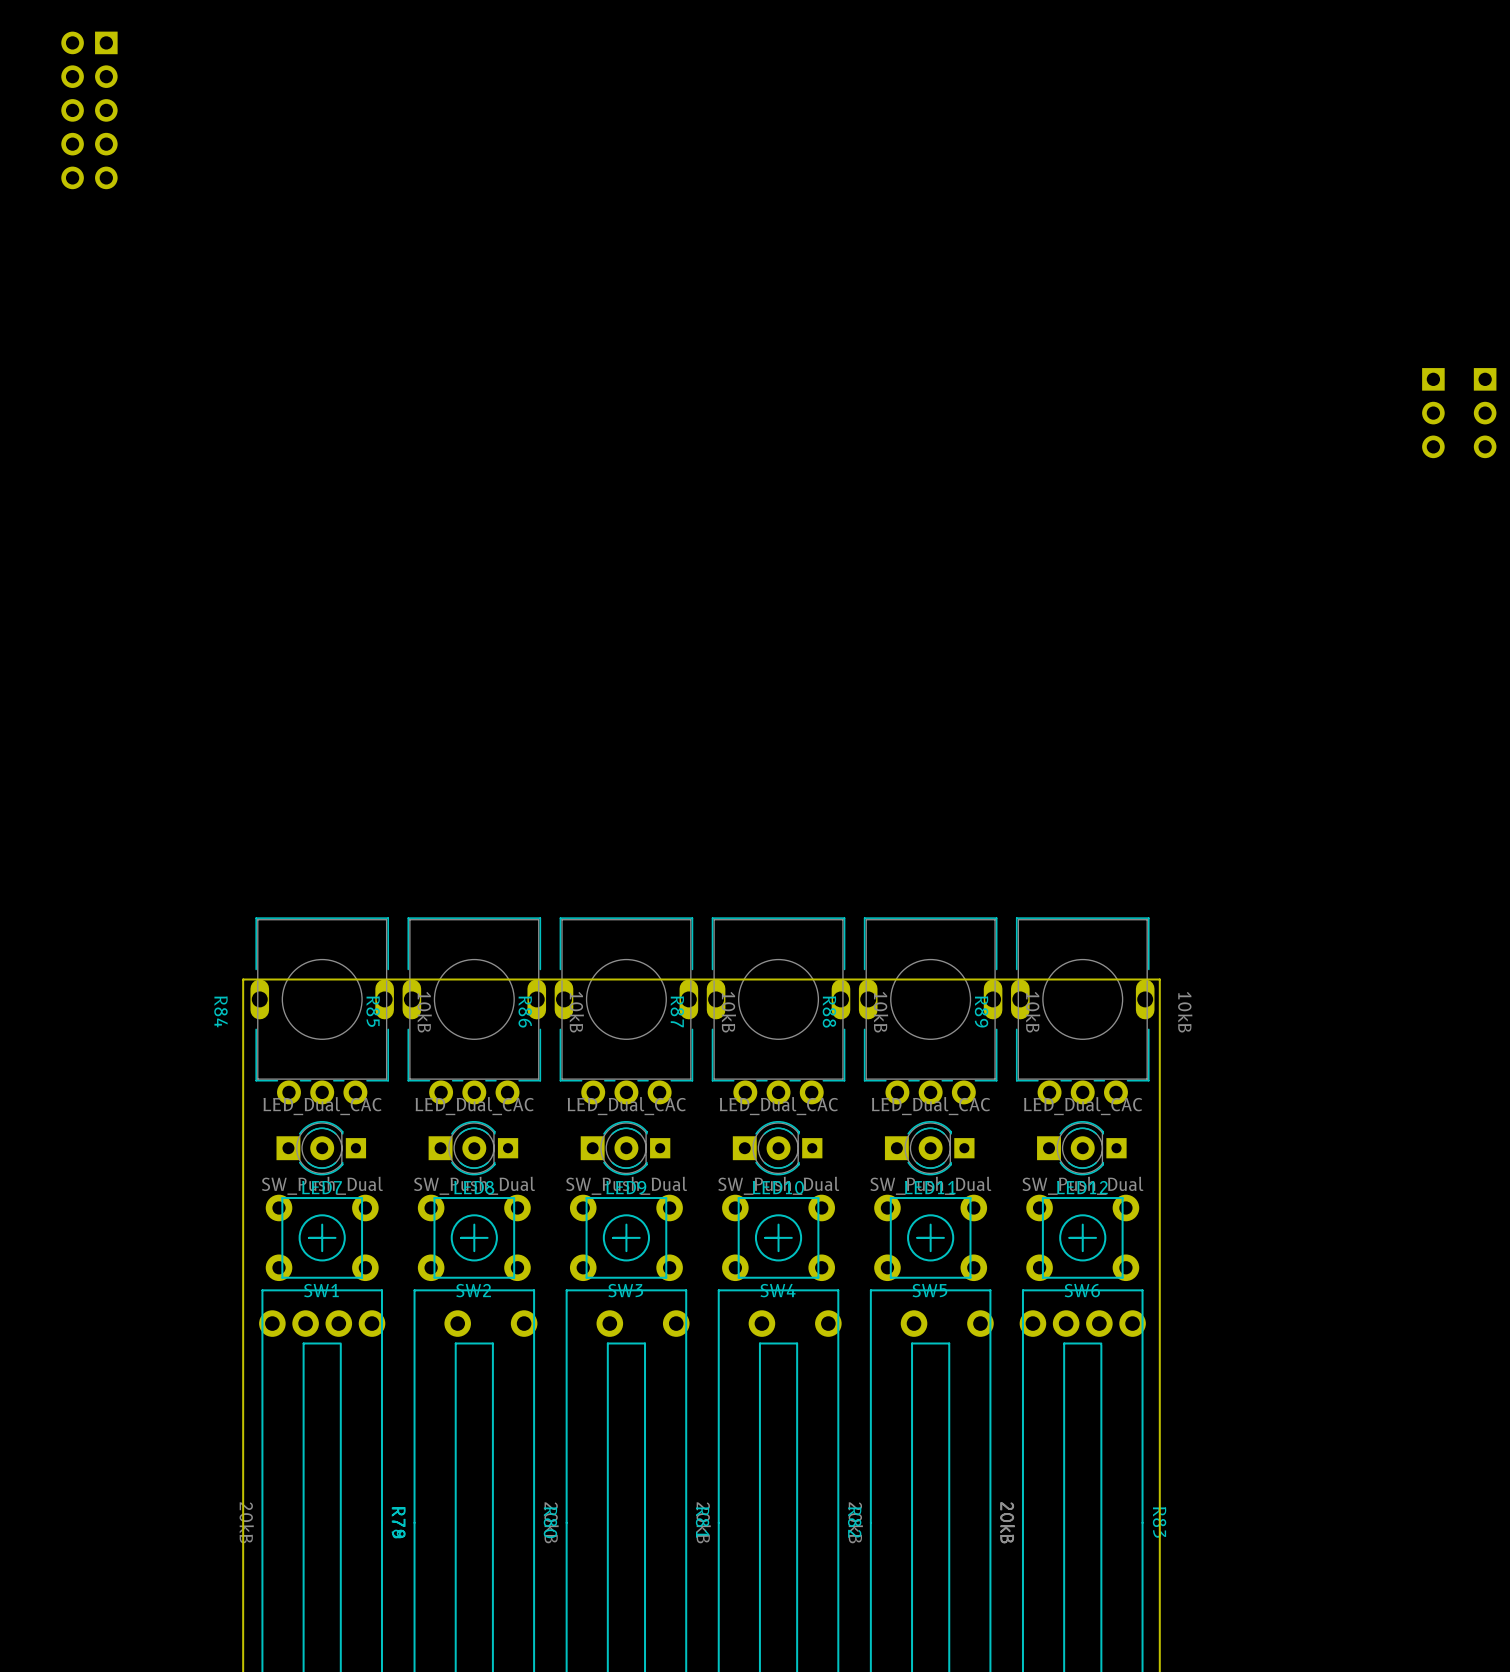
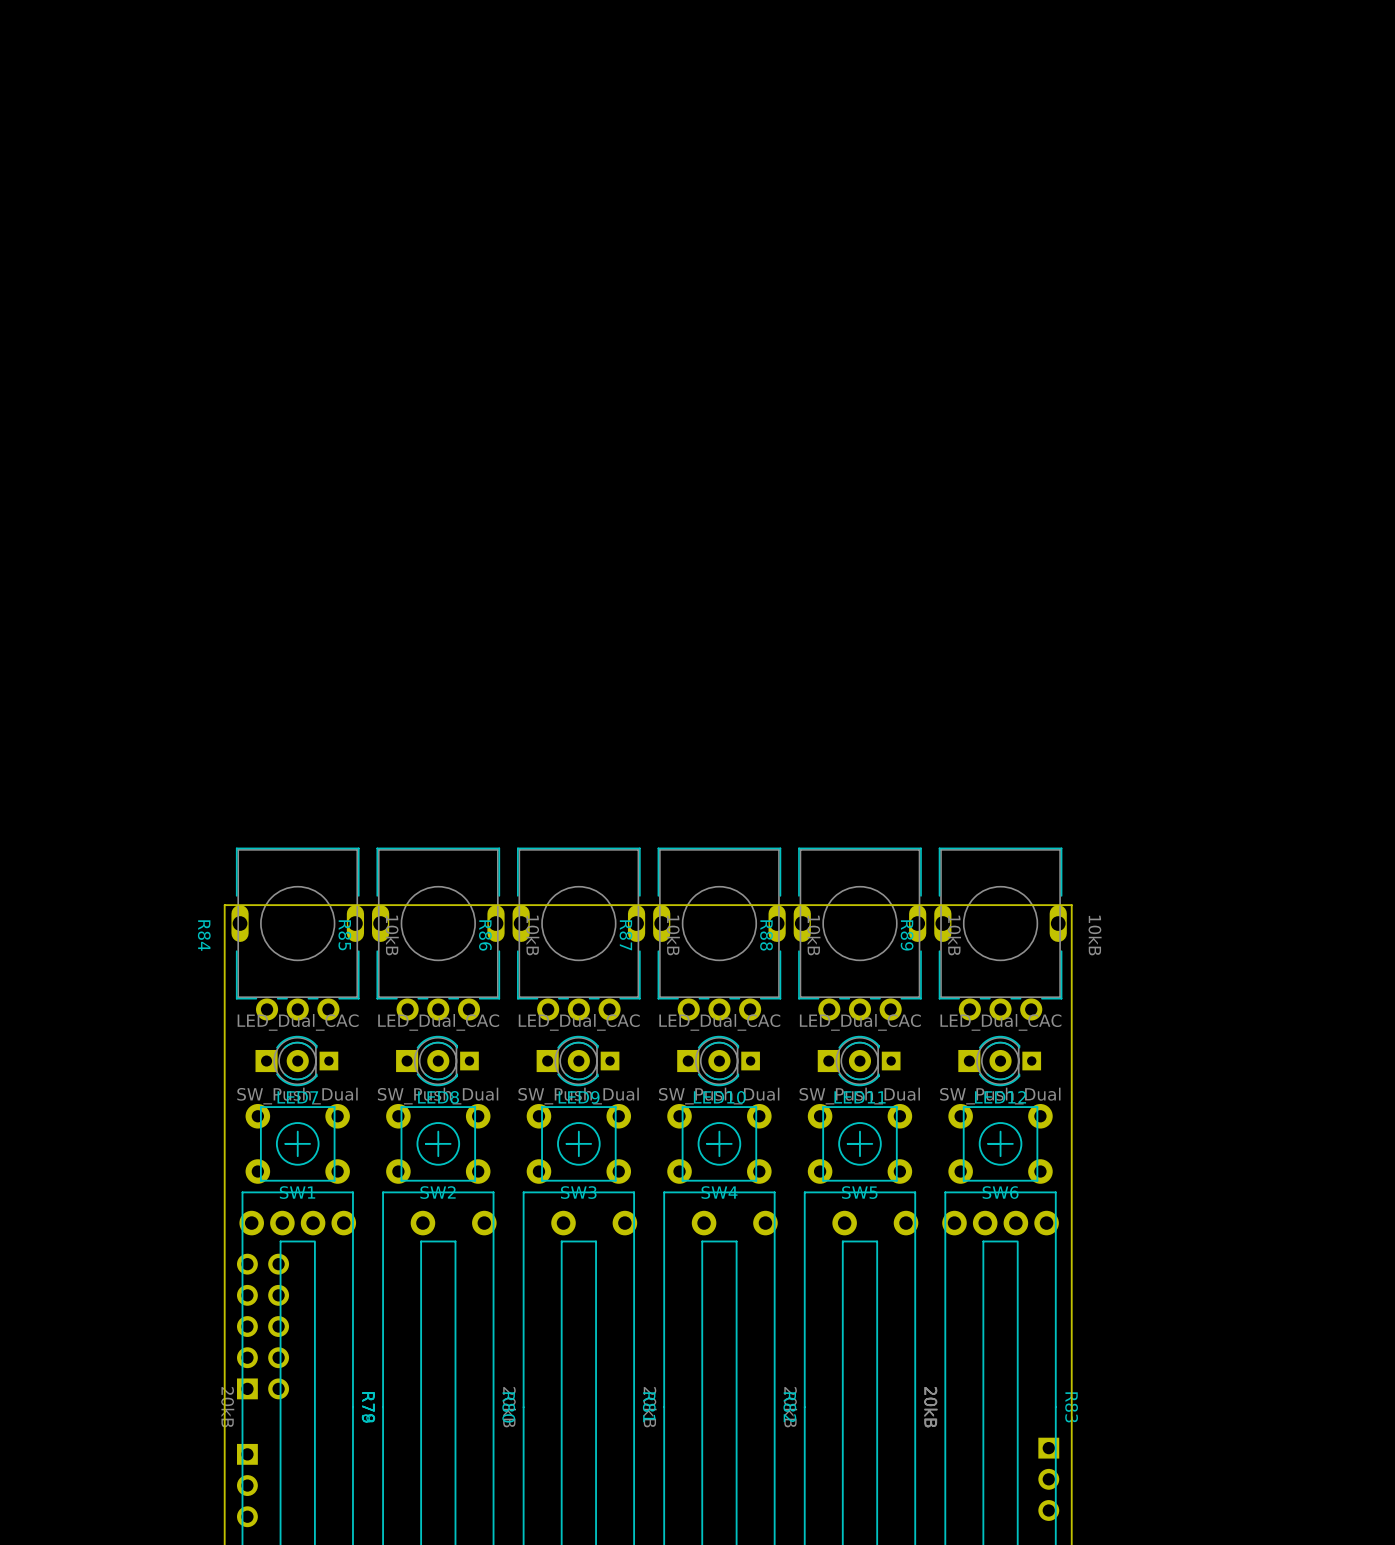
part: (89, 110) -> none
part: (1433, 413) -> none
part: (1485, 413) -> none
part: none -> (263, 1326)
part: none -> (1048, 1479)
part: none -> (247, 1485)

